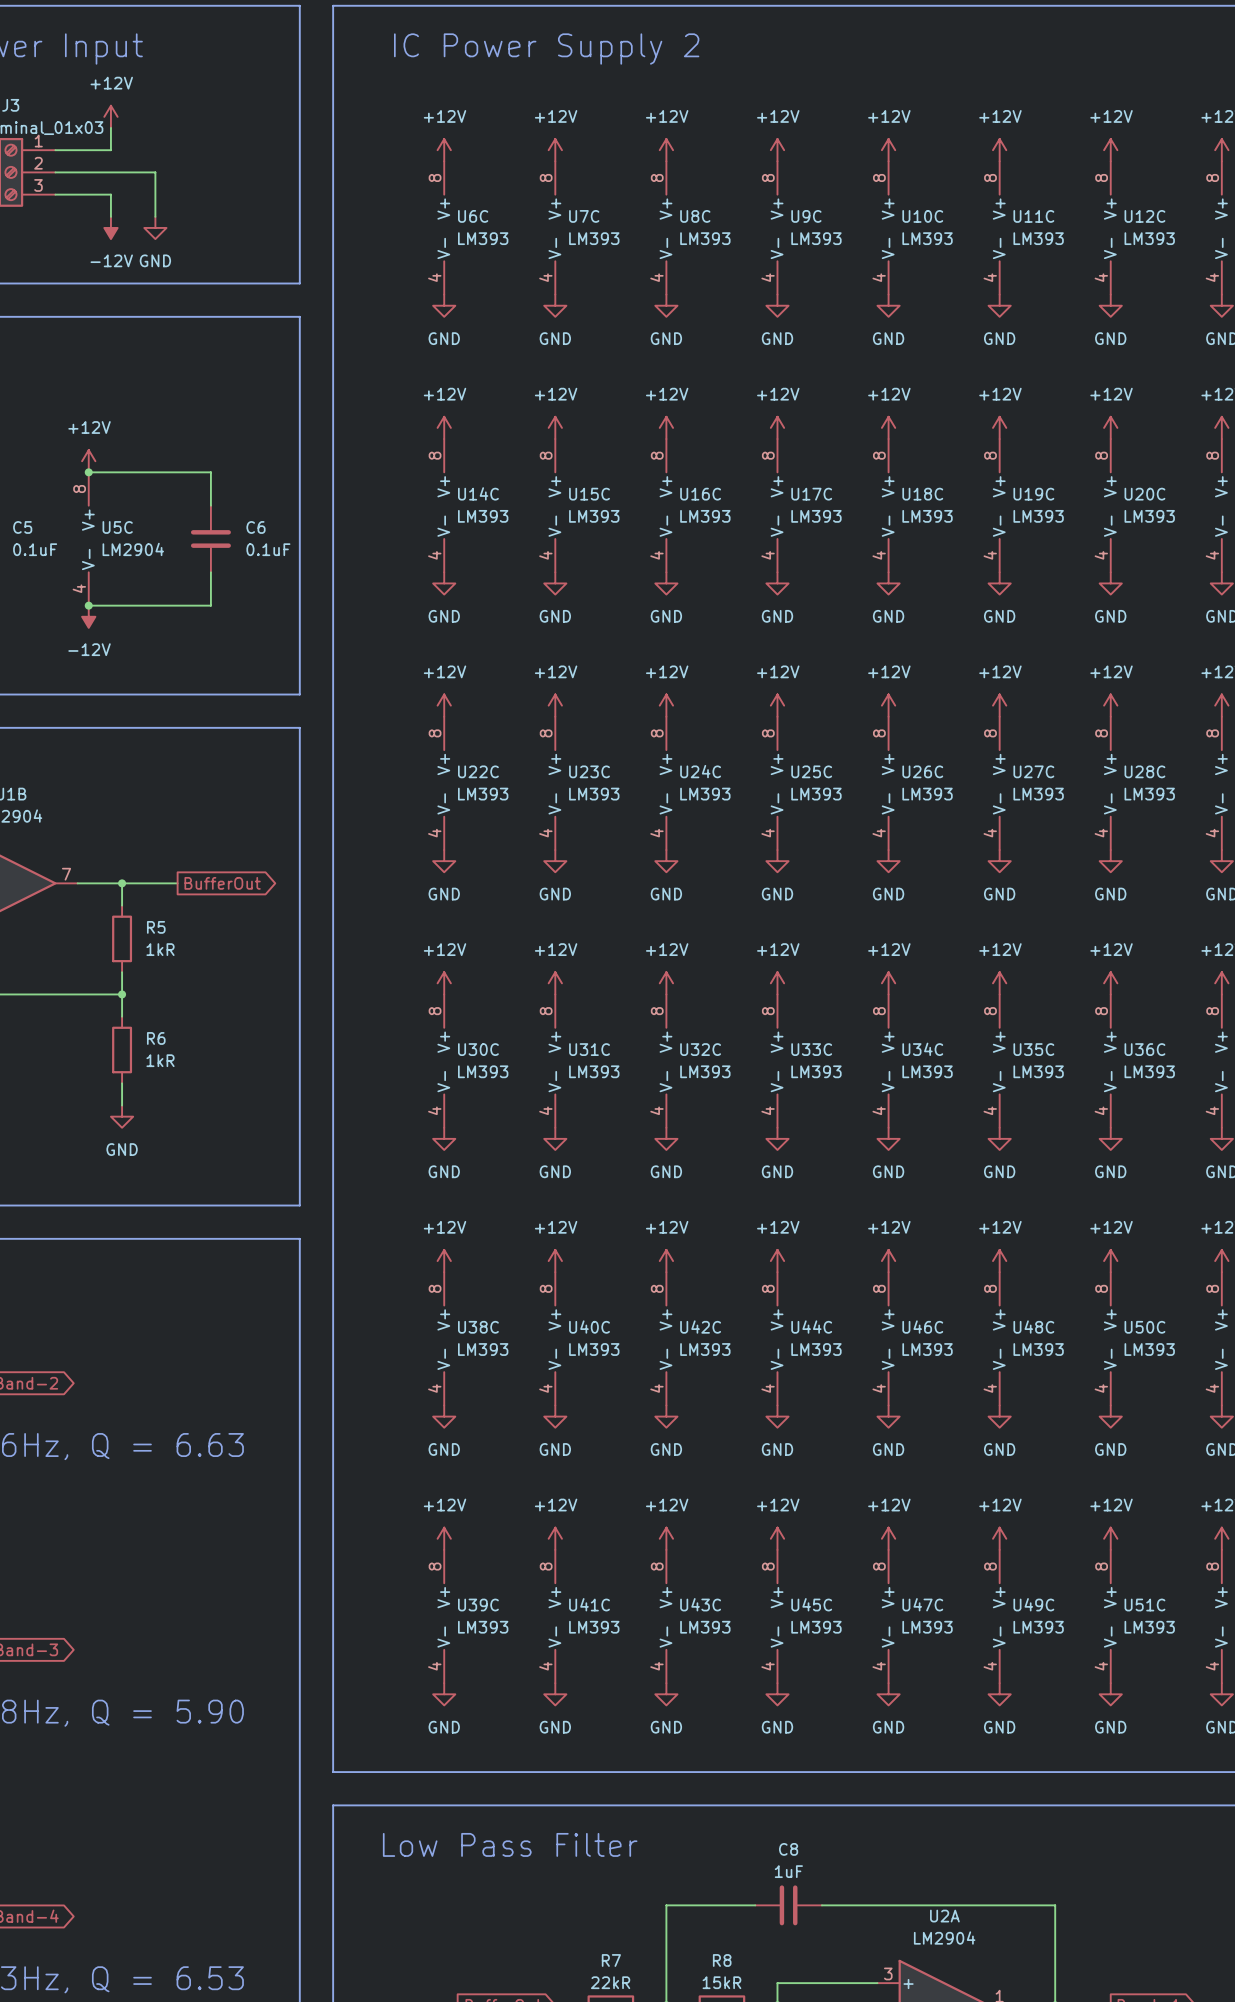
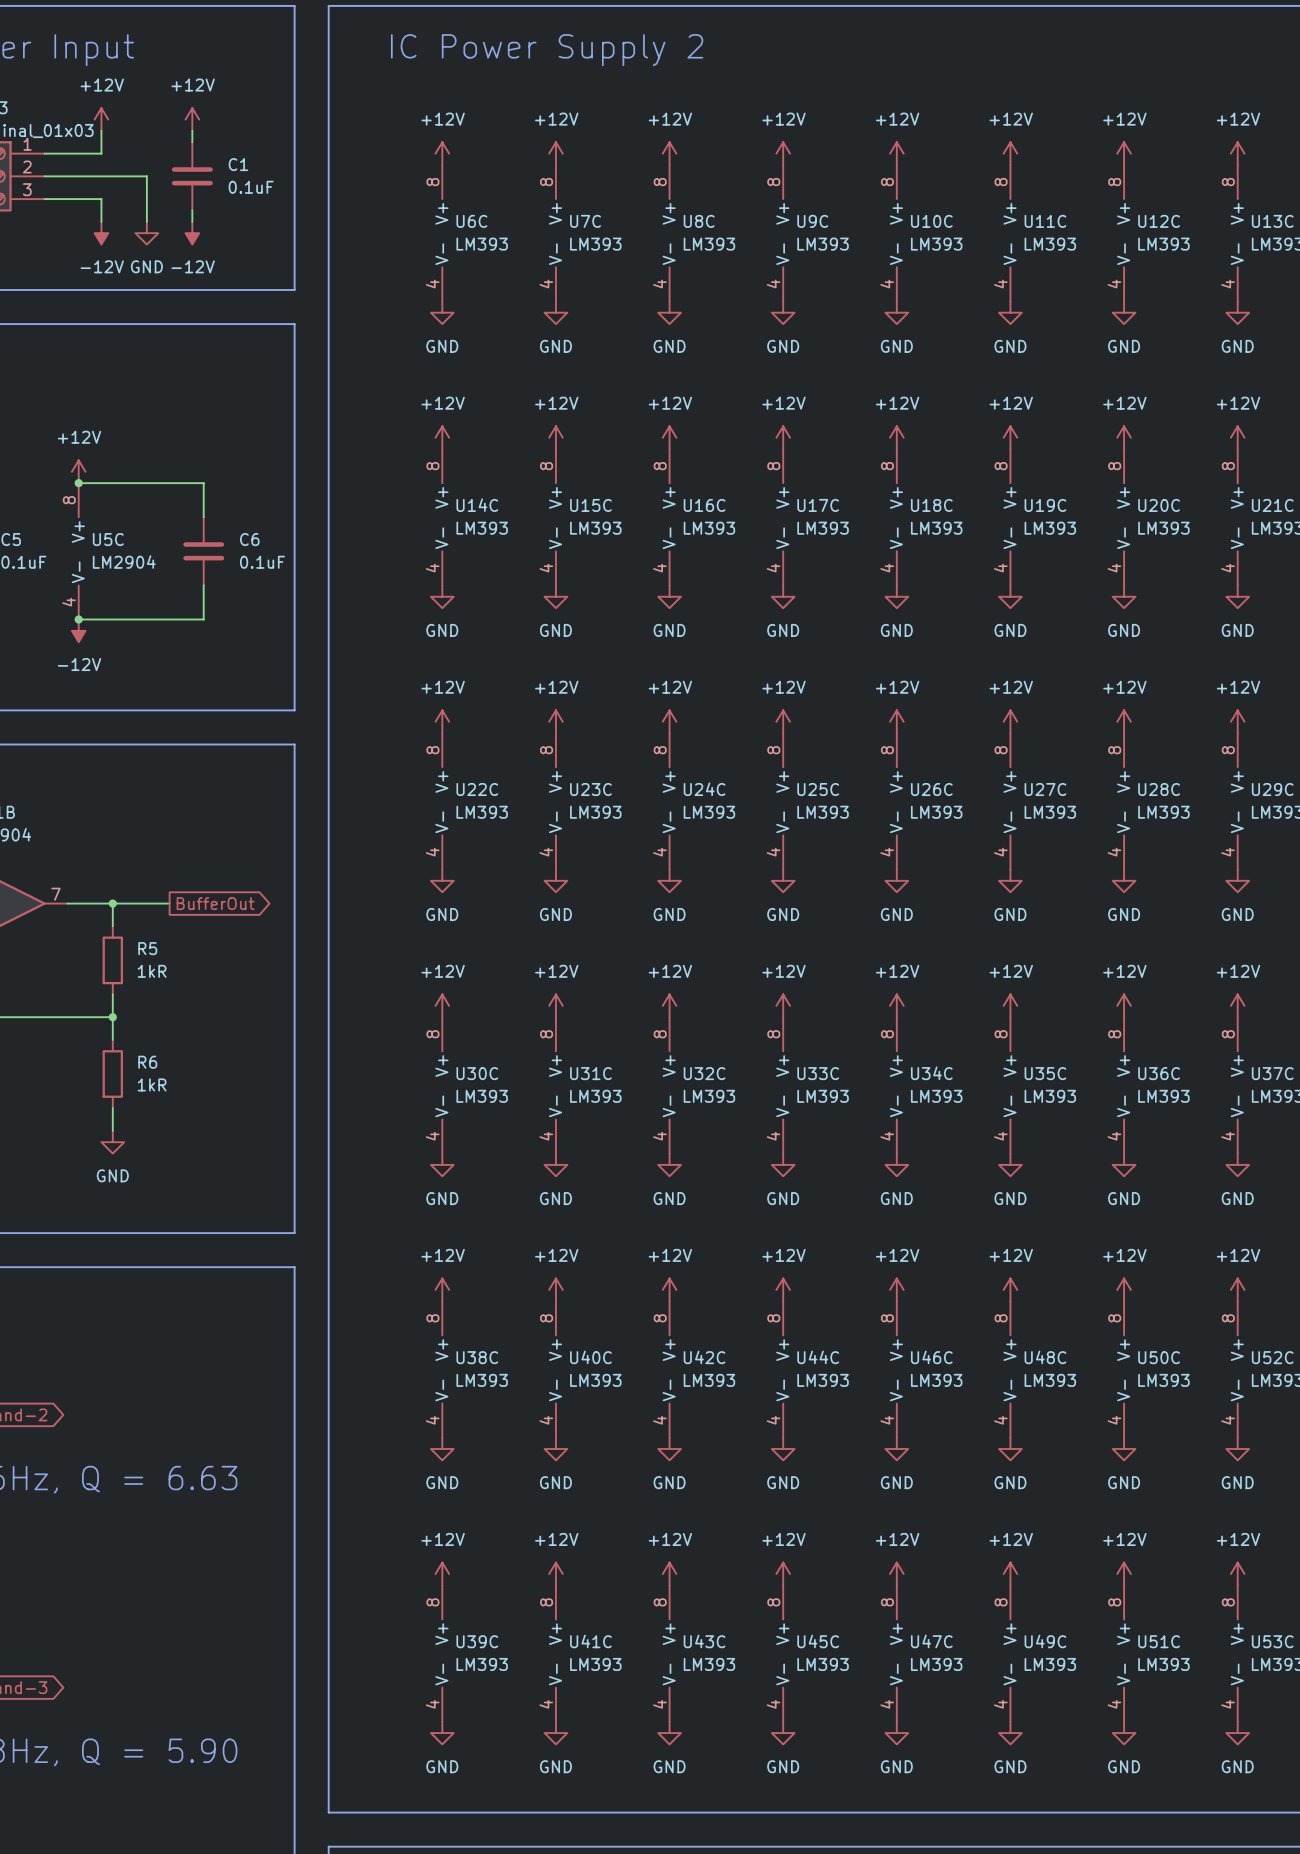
power symbol: none -> +12V (192, 119)
wire: none -> (192, 130) (192, 142)
C1: none -> 0.1uF (192, 176)
wire: none -> (192, 210) (192, 221)
power symbol: none -> -12V (192, 233)

